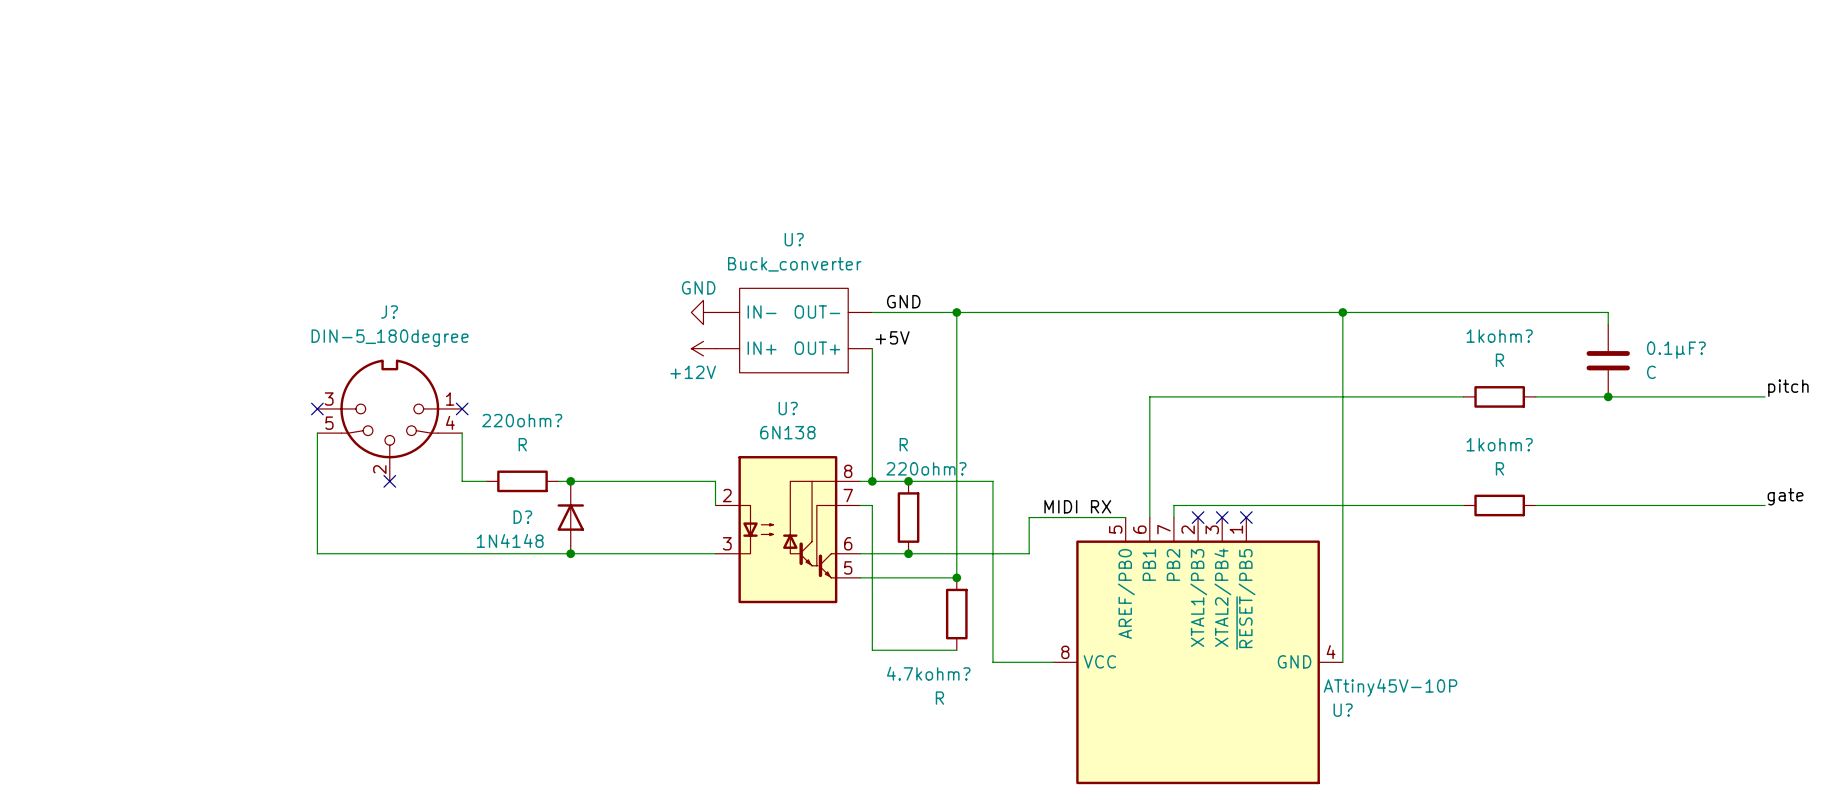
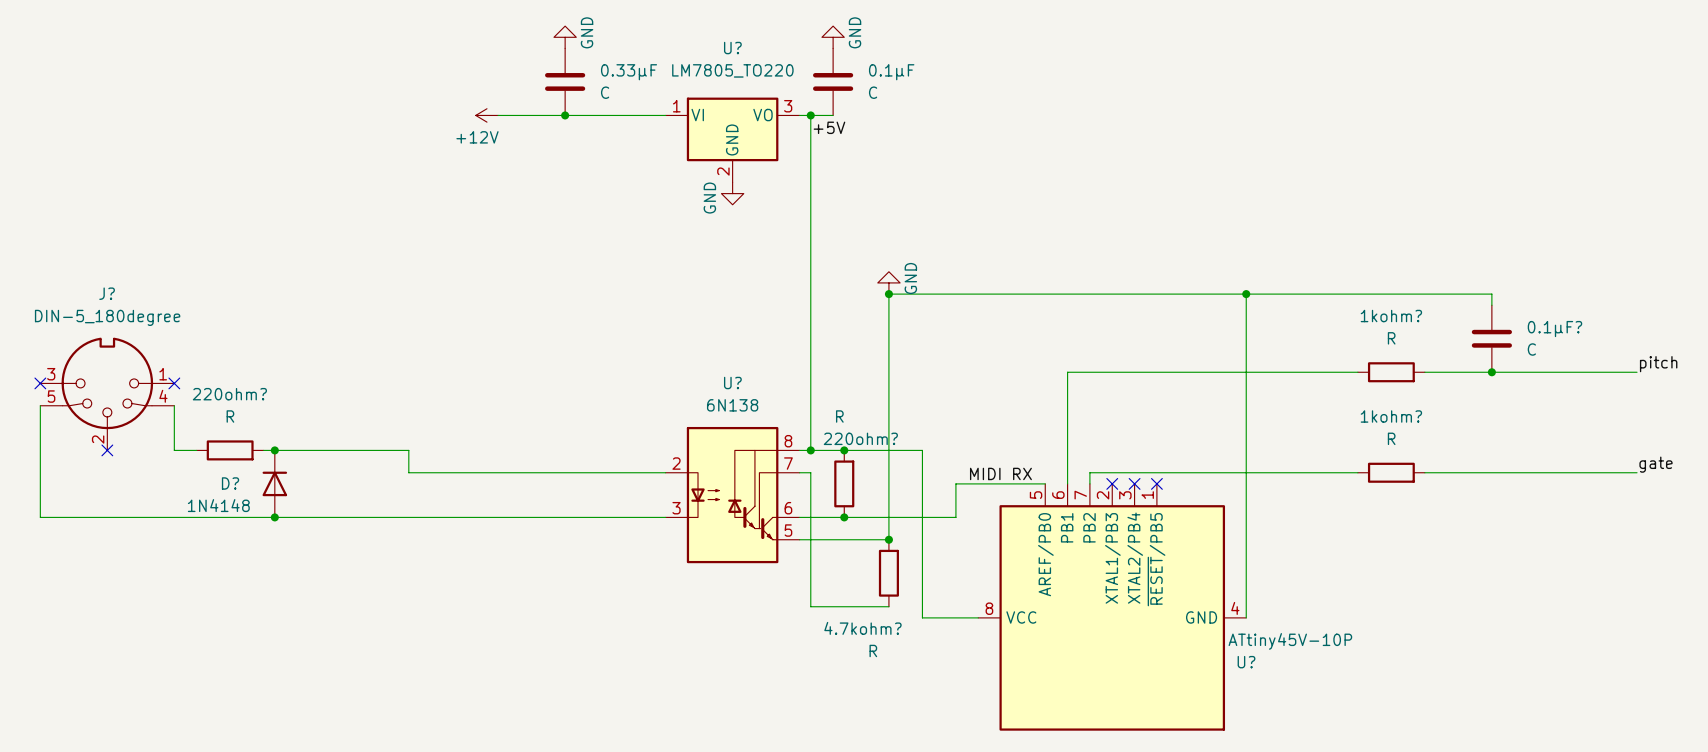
power symbol: none -> GND (565, 37)
power symbol: none -> GND (833, 37)
0.33µF: none -> C (565, 81)
0.1µF: none -> C (833, 81)
power symbol: none -> +12V (486, 115)
wire: none -> (498, 115) (665, 115)
junction: none -> (565, 115)
wire: none -> (799, 115) (833, 115)
wire: none -> (810, 115) (810, 327)
junction: none -> (810, 115)
U?: none -> LM7805_TO220 (732, 140)
power symbol: none -> GND (732, 193)
power symbol: none -> GND (888, 282)
label: GND (903, 301) -> none
power symbol: GND (703, 312) -> none
wire: (872, 312) (956, 312) -> none
U?: Buck_converter (793, 330) -> none
label position: +5V (892, 337) -> +5V (829, 127)
power symbol: +12V (703, 348) -> none
no-connect mark: none -> (40, 383)
no-connect mark: none -> (174, 383)
no-connect mark: (317, 408) -> none
no-connect mark: (462, 408) -> none
J?: none -> DIN-5_180degree (107, 394)
J?: DIN-5_180degree (389, 420) -> none
wire: none -> (174, 405) (174, 450) (196, 450)
wire: (317, 433) (317, 553) -> (40, 405) (40, 517) (297, 517)
wire: (462, 433) (462, 481) (486, 481) -> none
no-connect mark: none -> (107, 450)
220ohm?: none -> R (230, 450)
junction: none -> (274, 450)
no-connect mark: (389, 481) -> none
220ohm?: R (522, 481) -> none
wire: (558, 481) (715, 481) (715, 505) -> (263, 450) (408, 450) (408, 472) (665, 472)
junction: (570, 481) -> none
D?: none -> 1N4148 (274, 483)
D?: 1N4148 (570, 517) -> none
junction: none -> (274, 517)
junction: (570, 553) -> none

